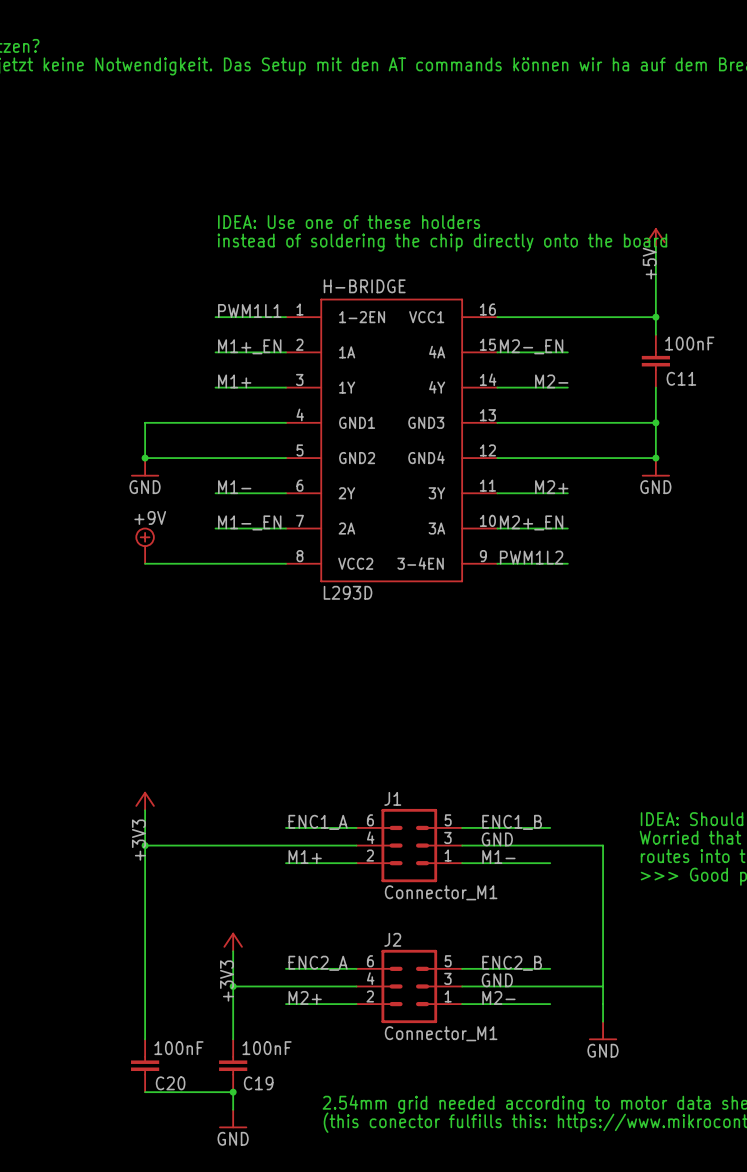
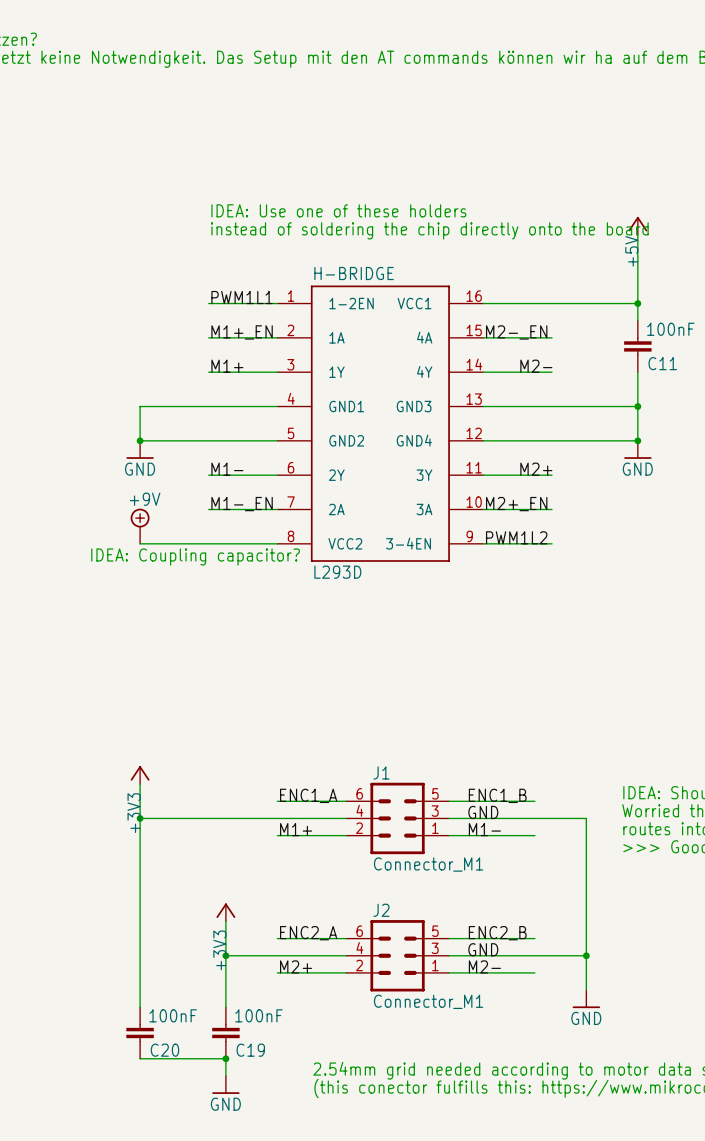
text: none -> IDEA: Coupling capacitor? (195, 556)
junction: none -> (586, 955)

